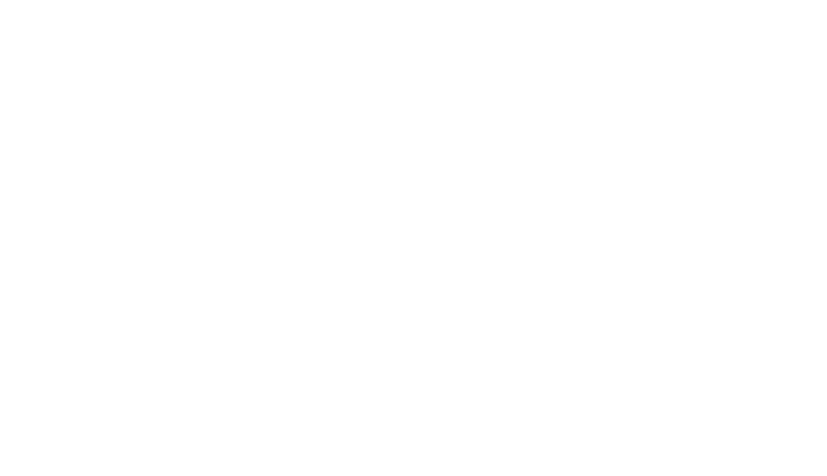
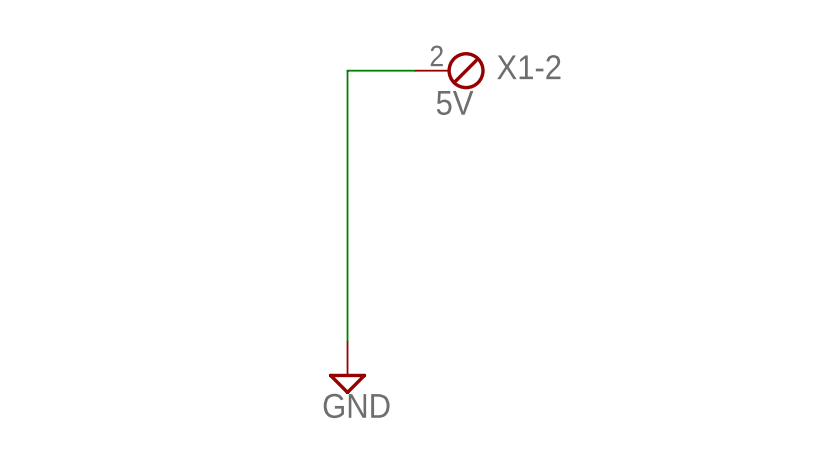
wire: none -> (415, 70) (347, 70) (347, 341)
X1-2: none -> 5V (449, 70)
power symbol: none -> GND (347, 367)

